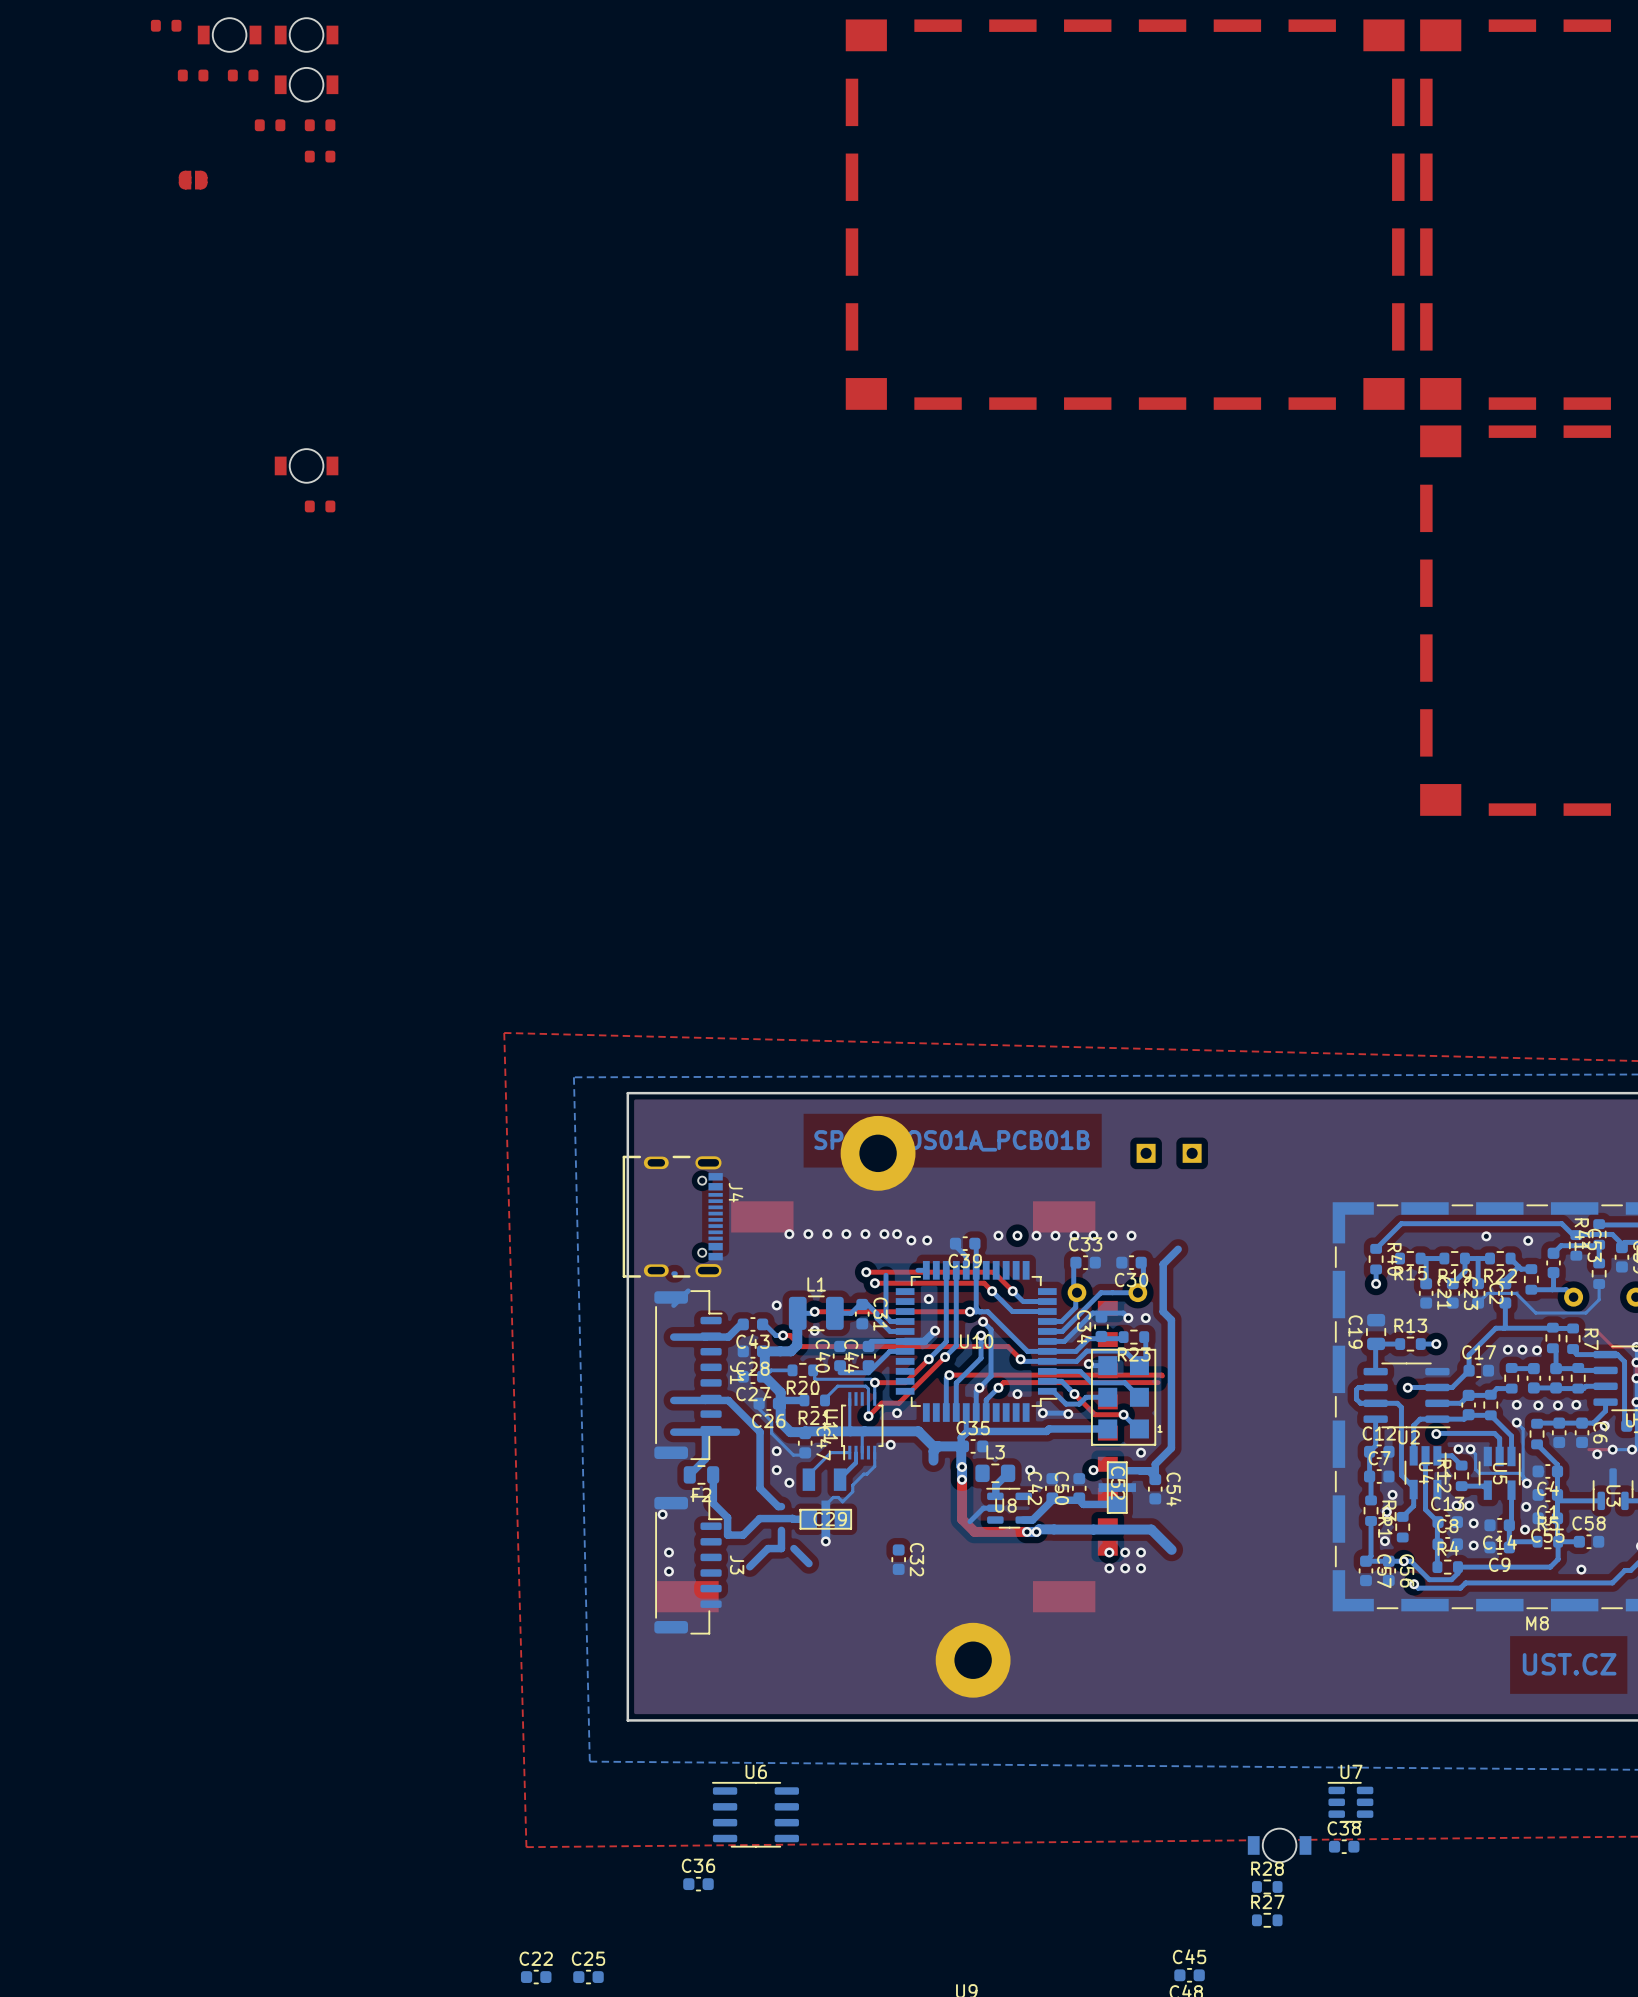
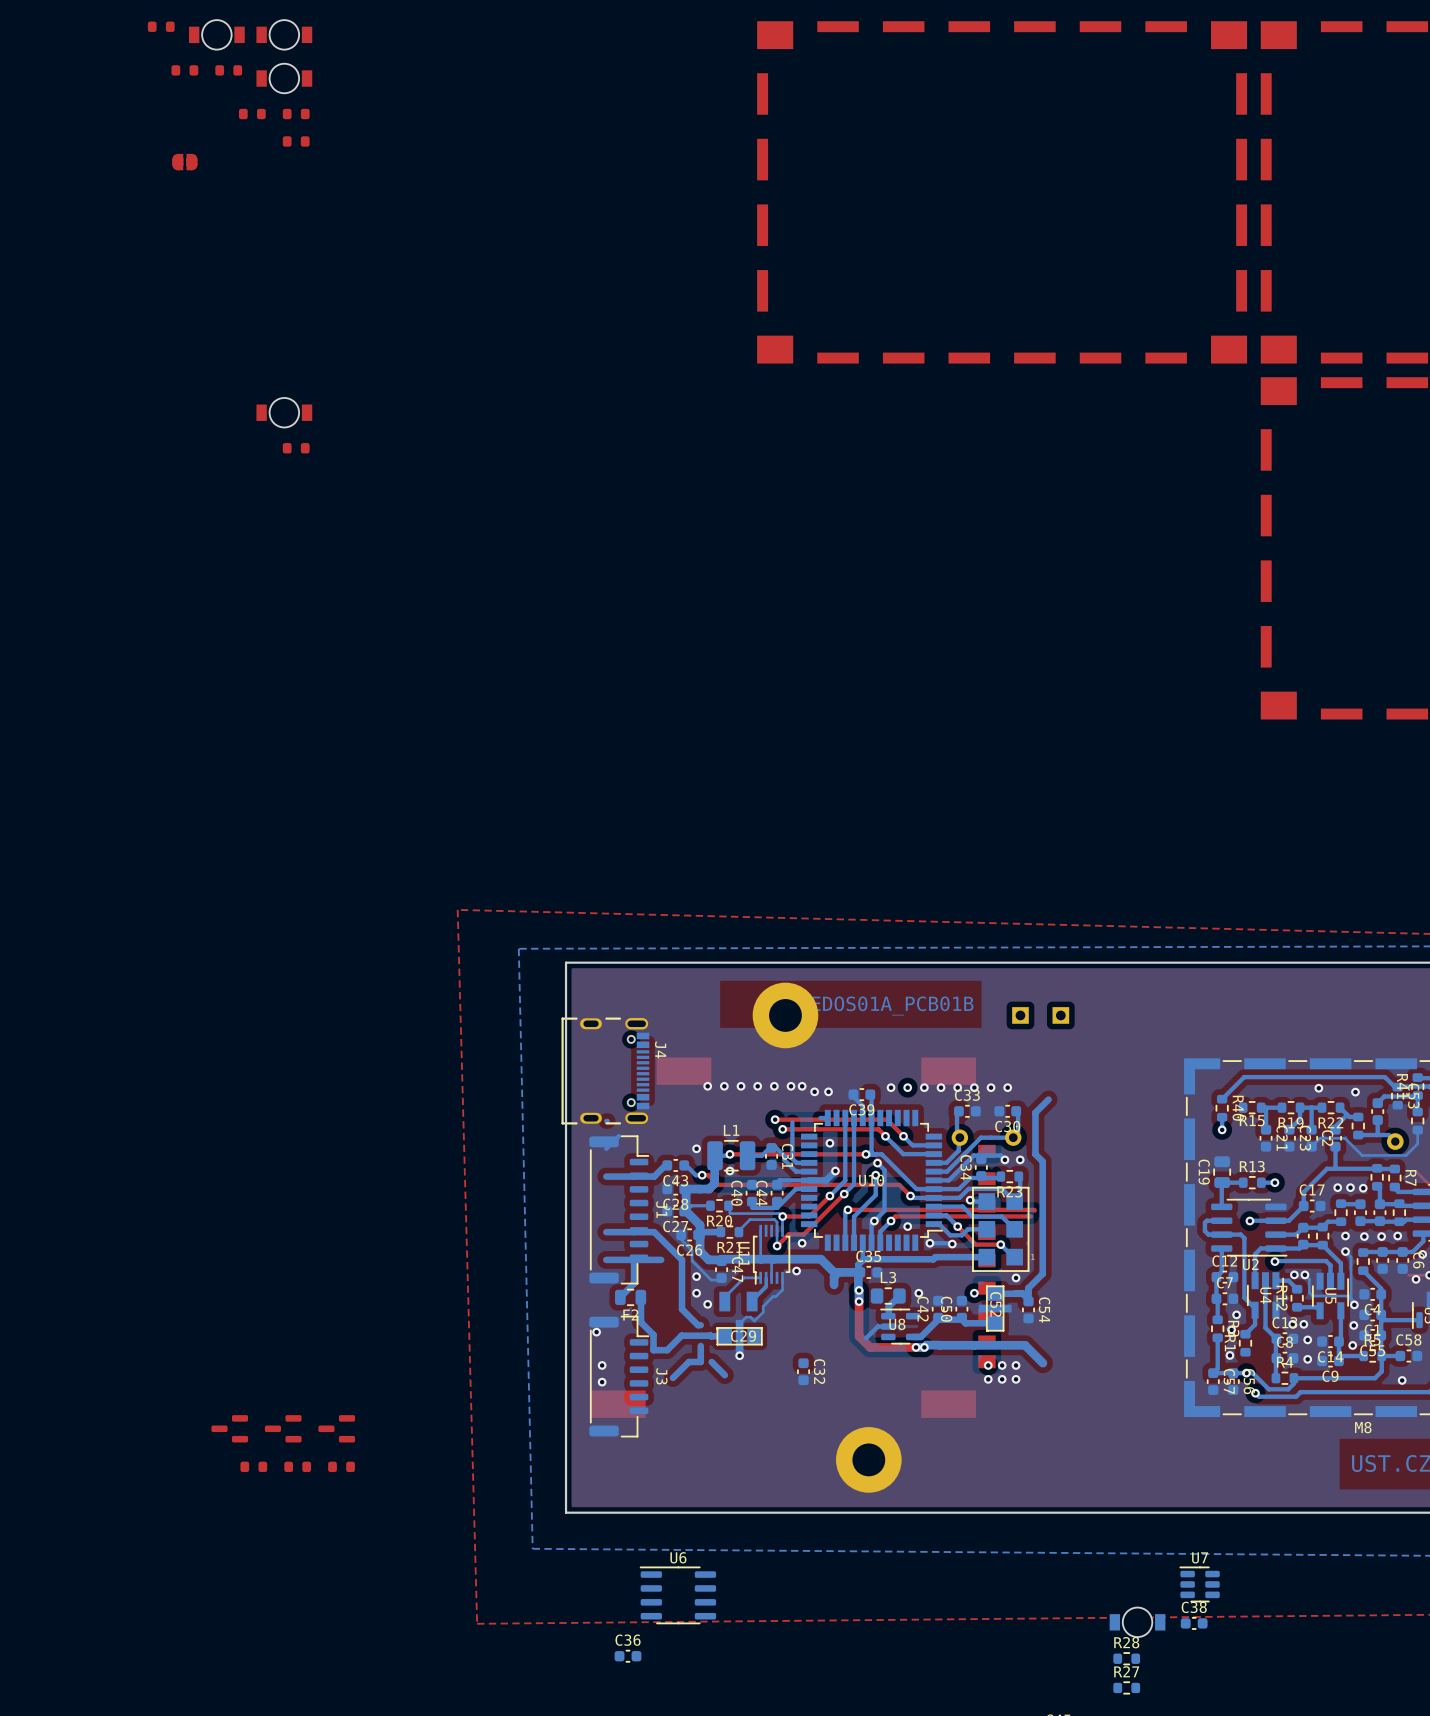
part: none -> (229, 1428)
part: none -> (283, 1428)
part: none -> (336, 1428)
part: none -> (253, 1466)
part: none -> (297, 1466)
part: none -> (341, 1466)

